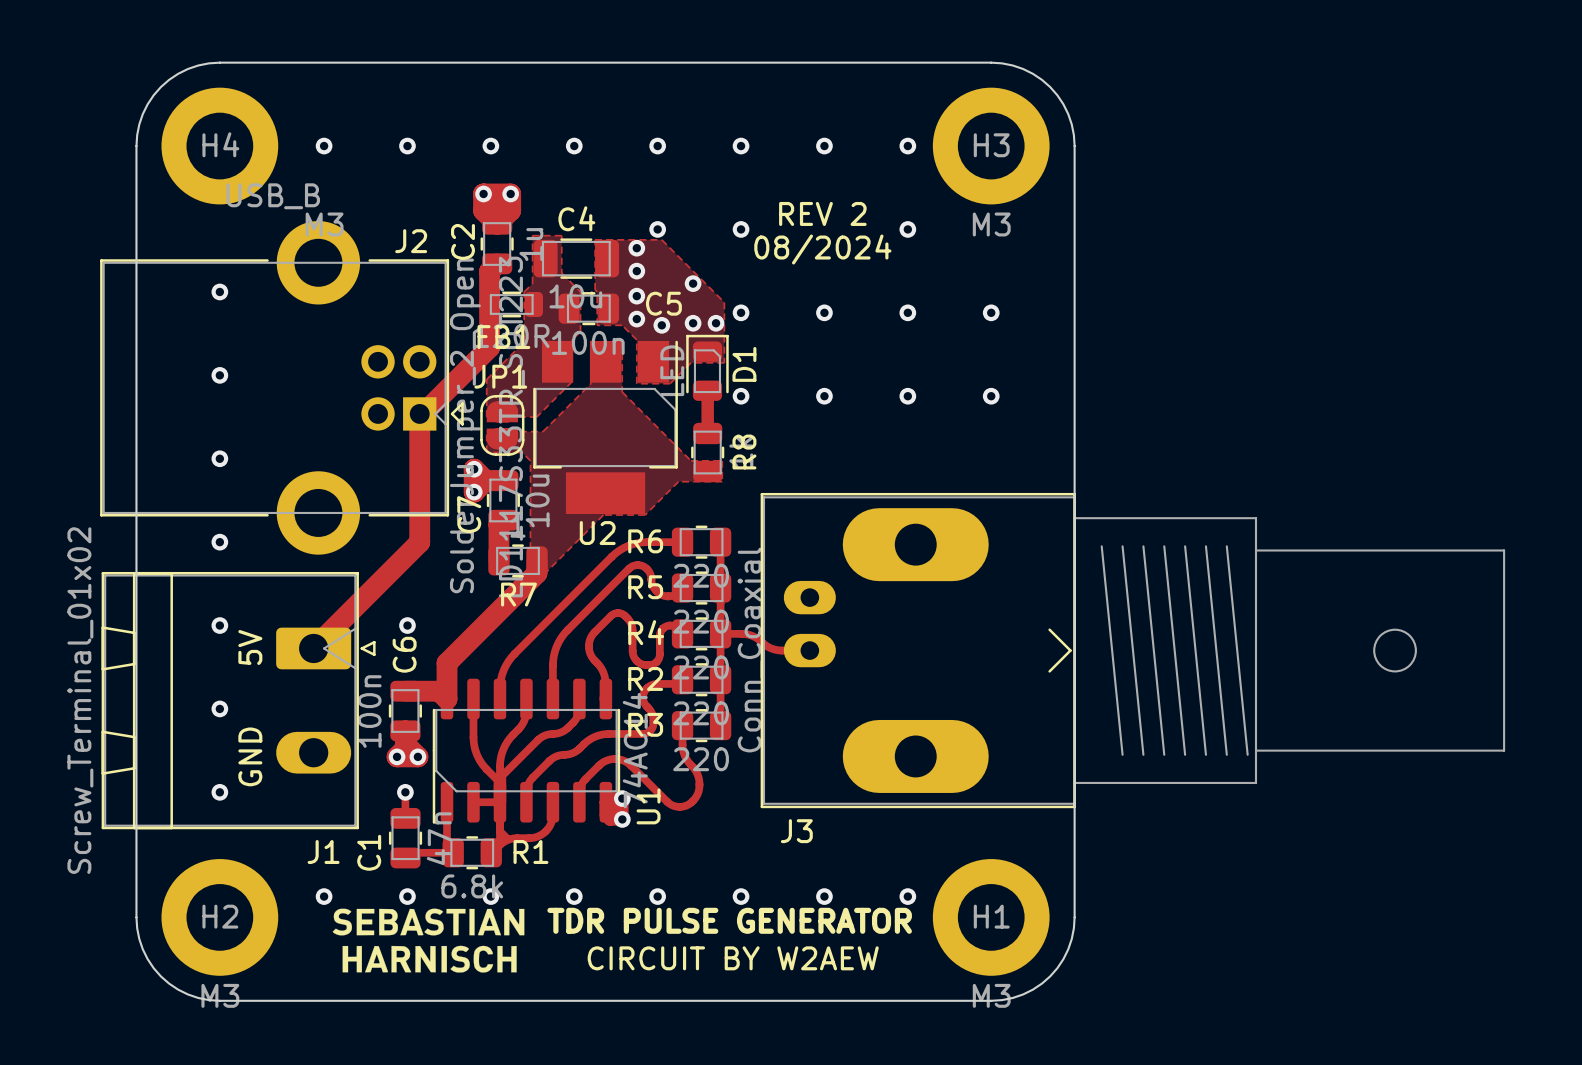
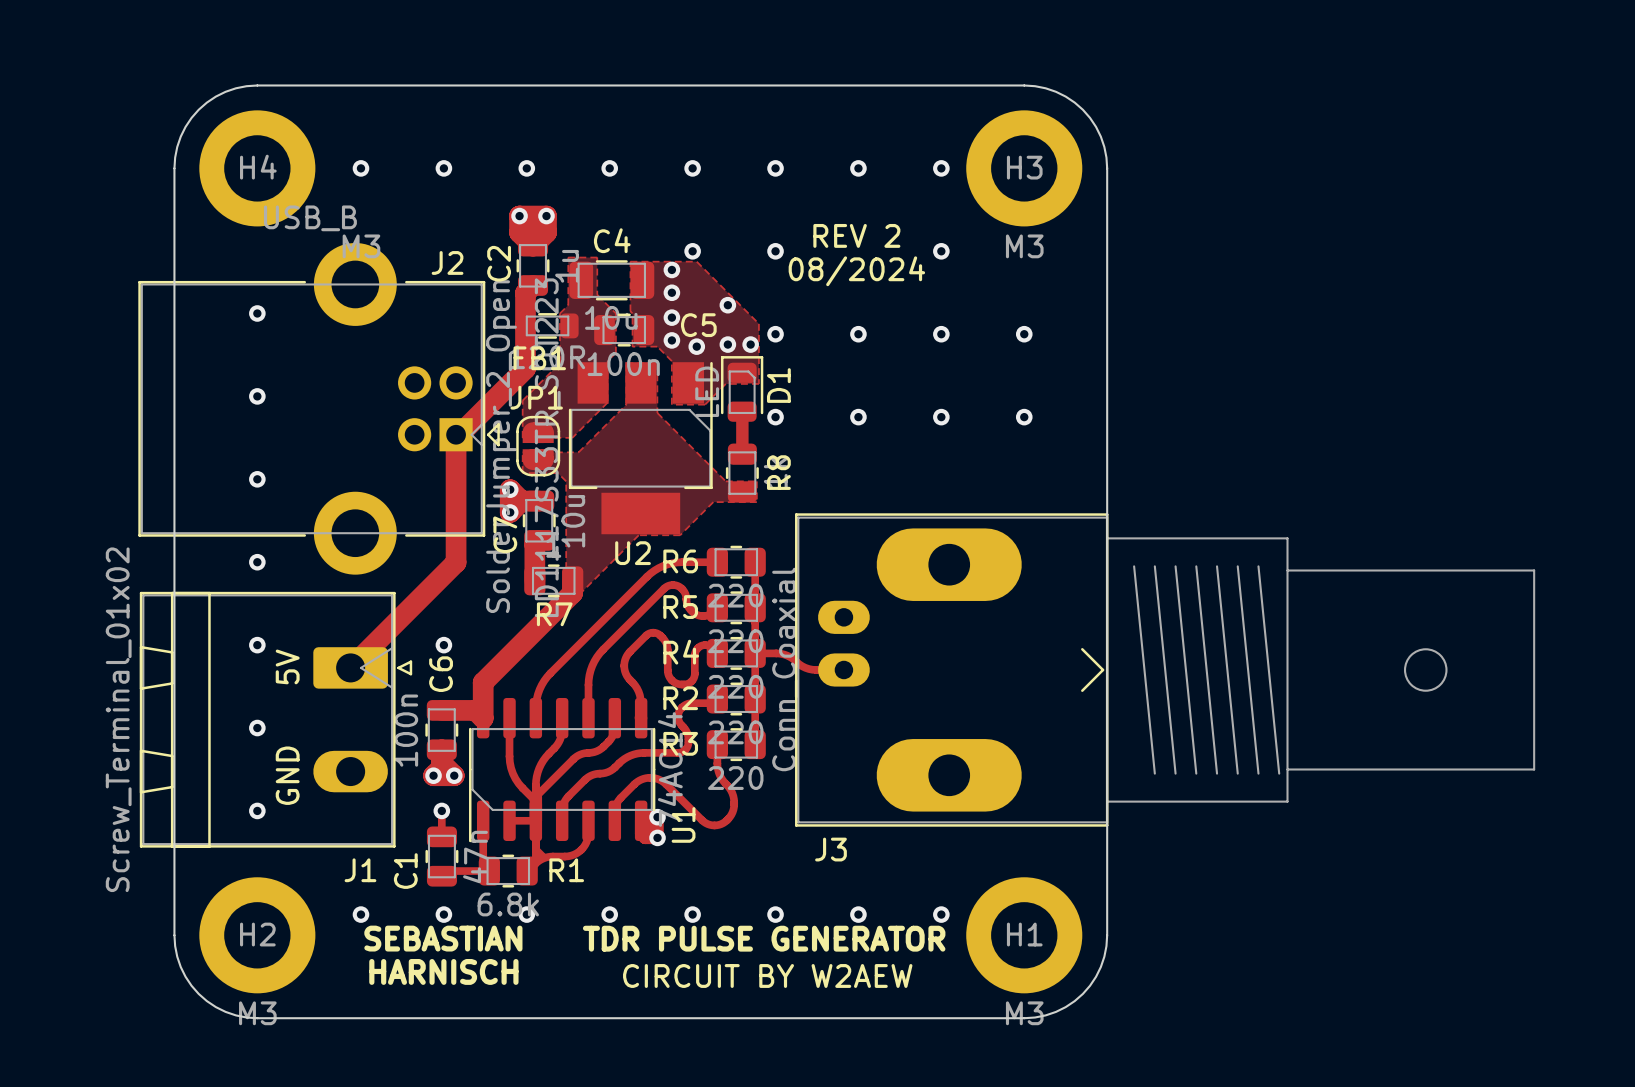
drawing: [332, 908, 525, 973] -> none
text: none -> SEBASTIAN (443, 938)
text: none -> HARNISCH (443, 971)

